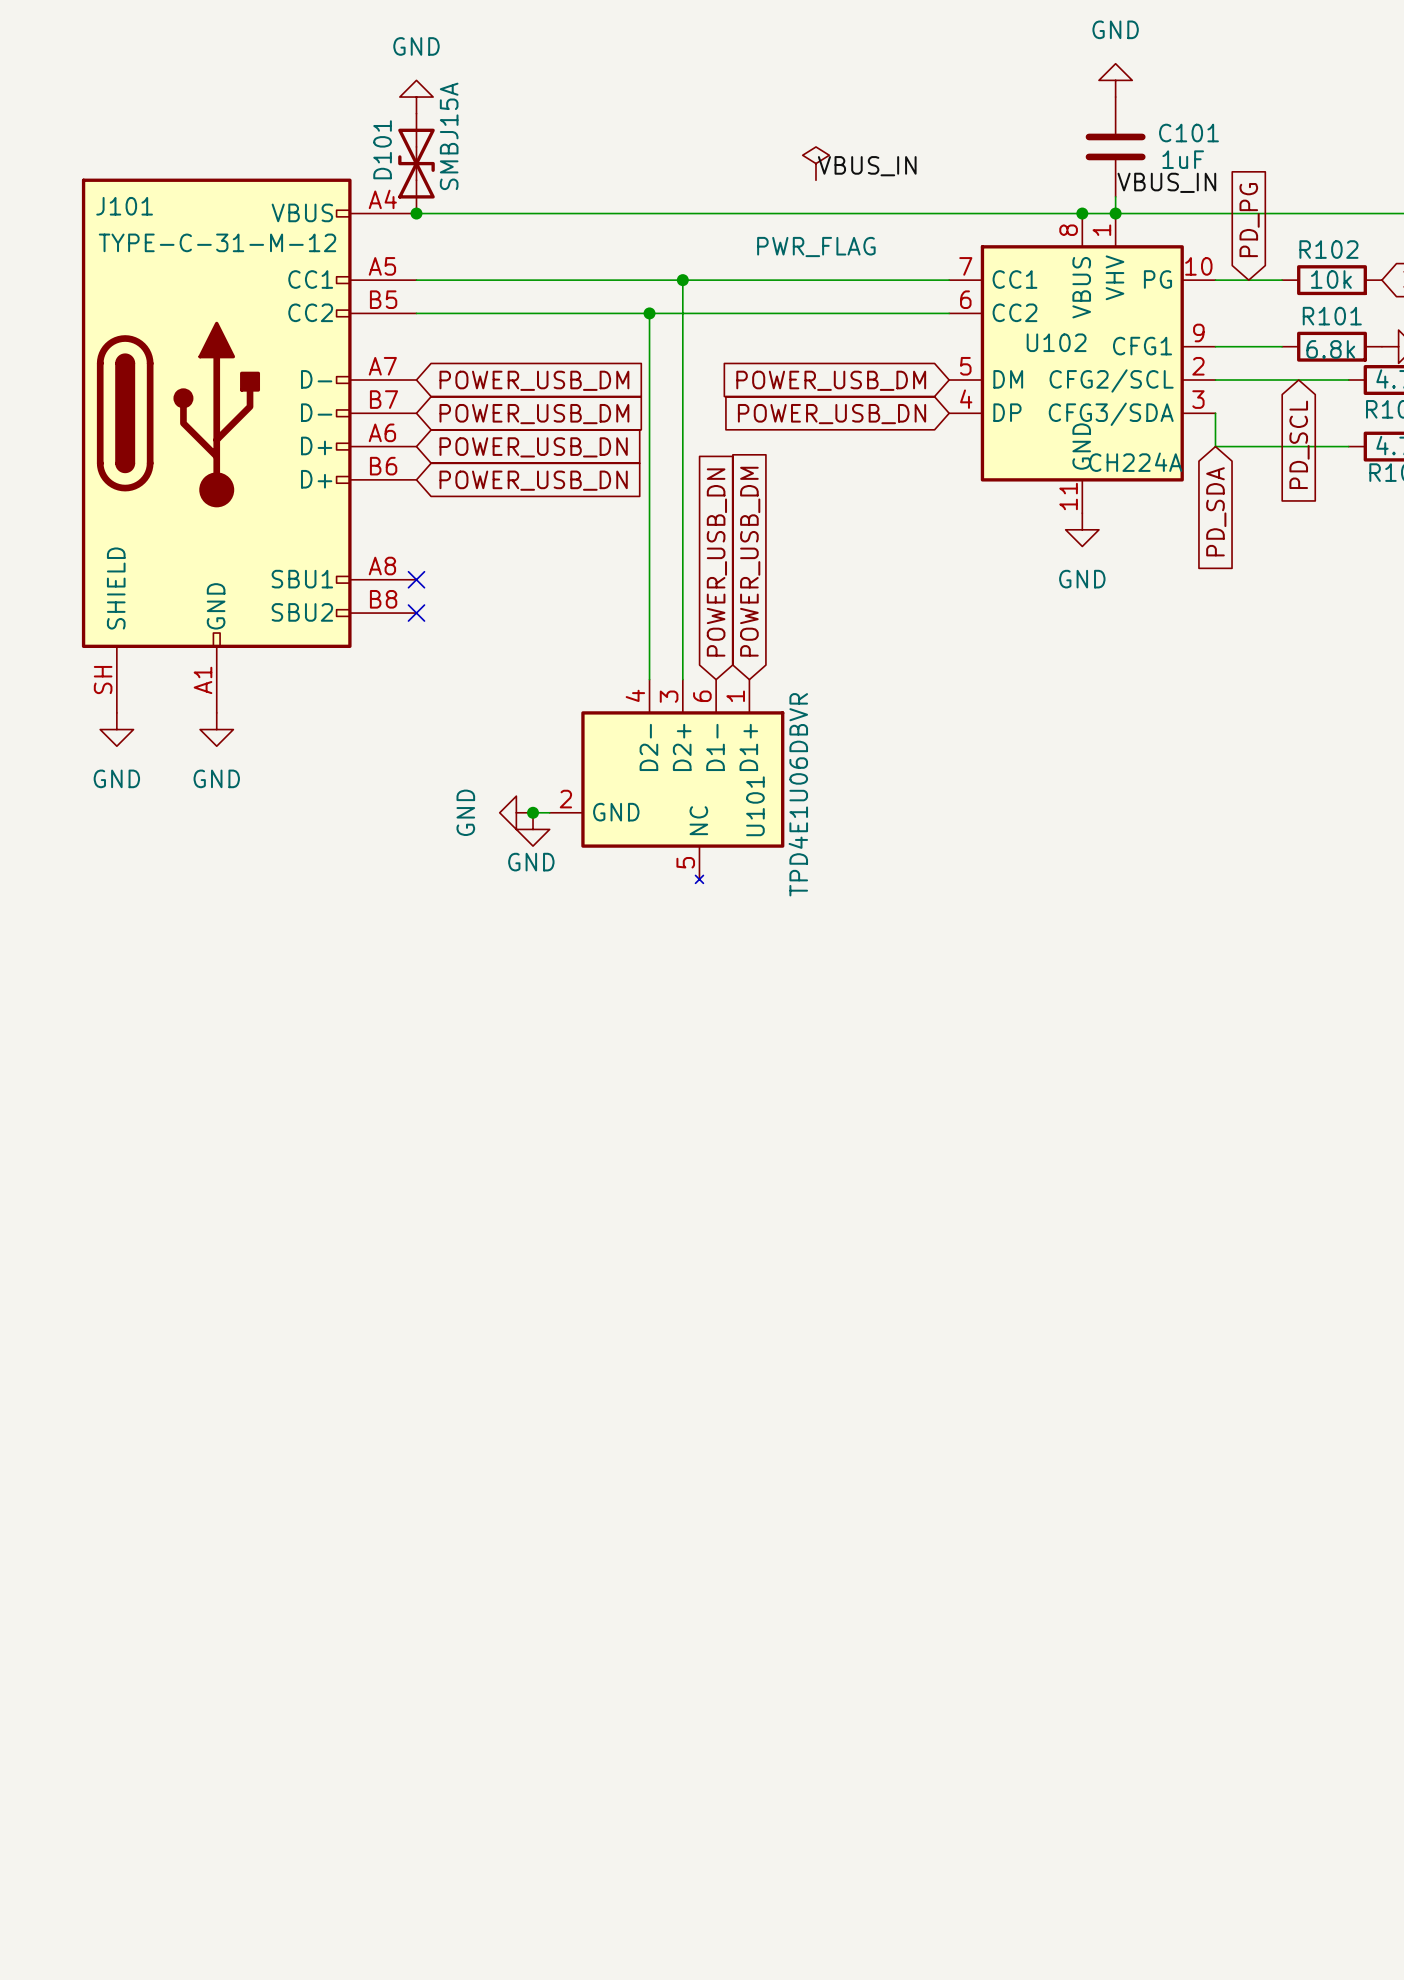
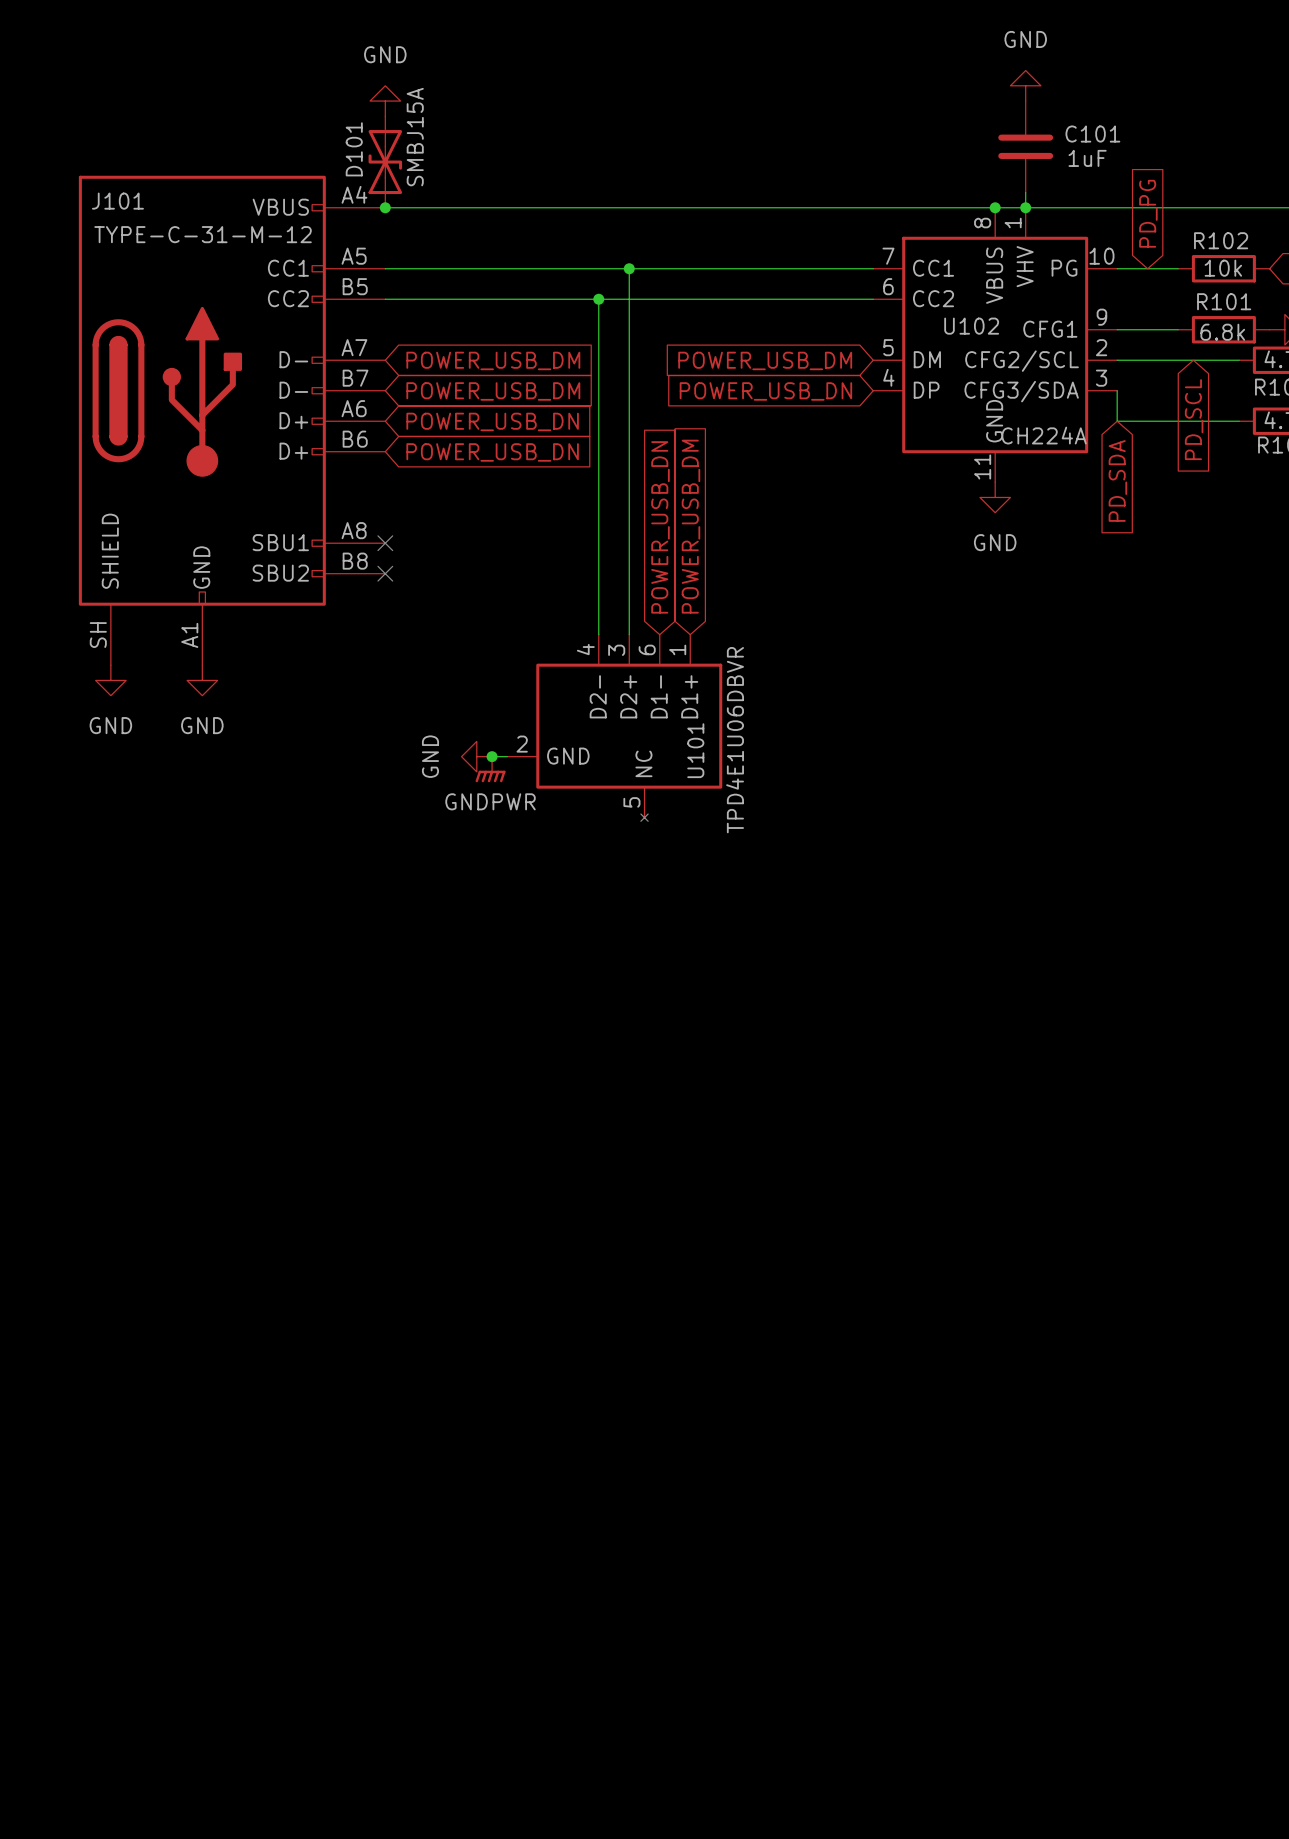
power symbol: PWR_FLAG (815, 163) -> none
label: VBUS_IN (867, 166) -> none
label: VBUS_IN (1166, 182) -> none
power symbol: GND (533, 829) -> GNDPWR (490, 769)

